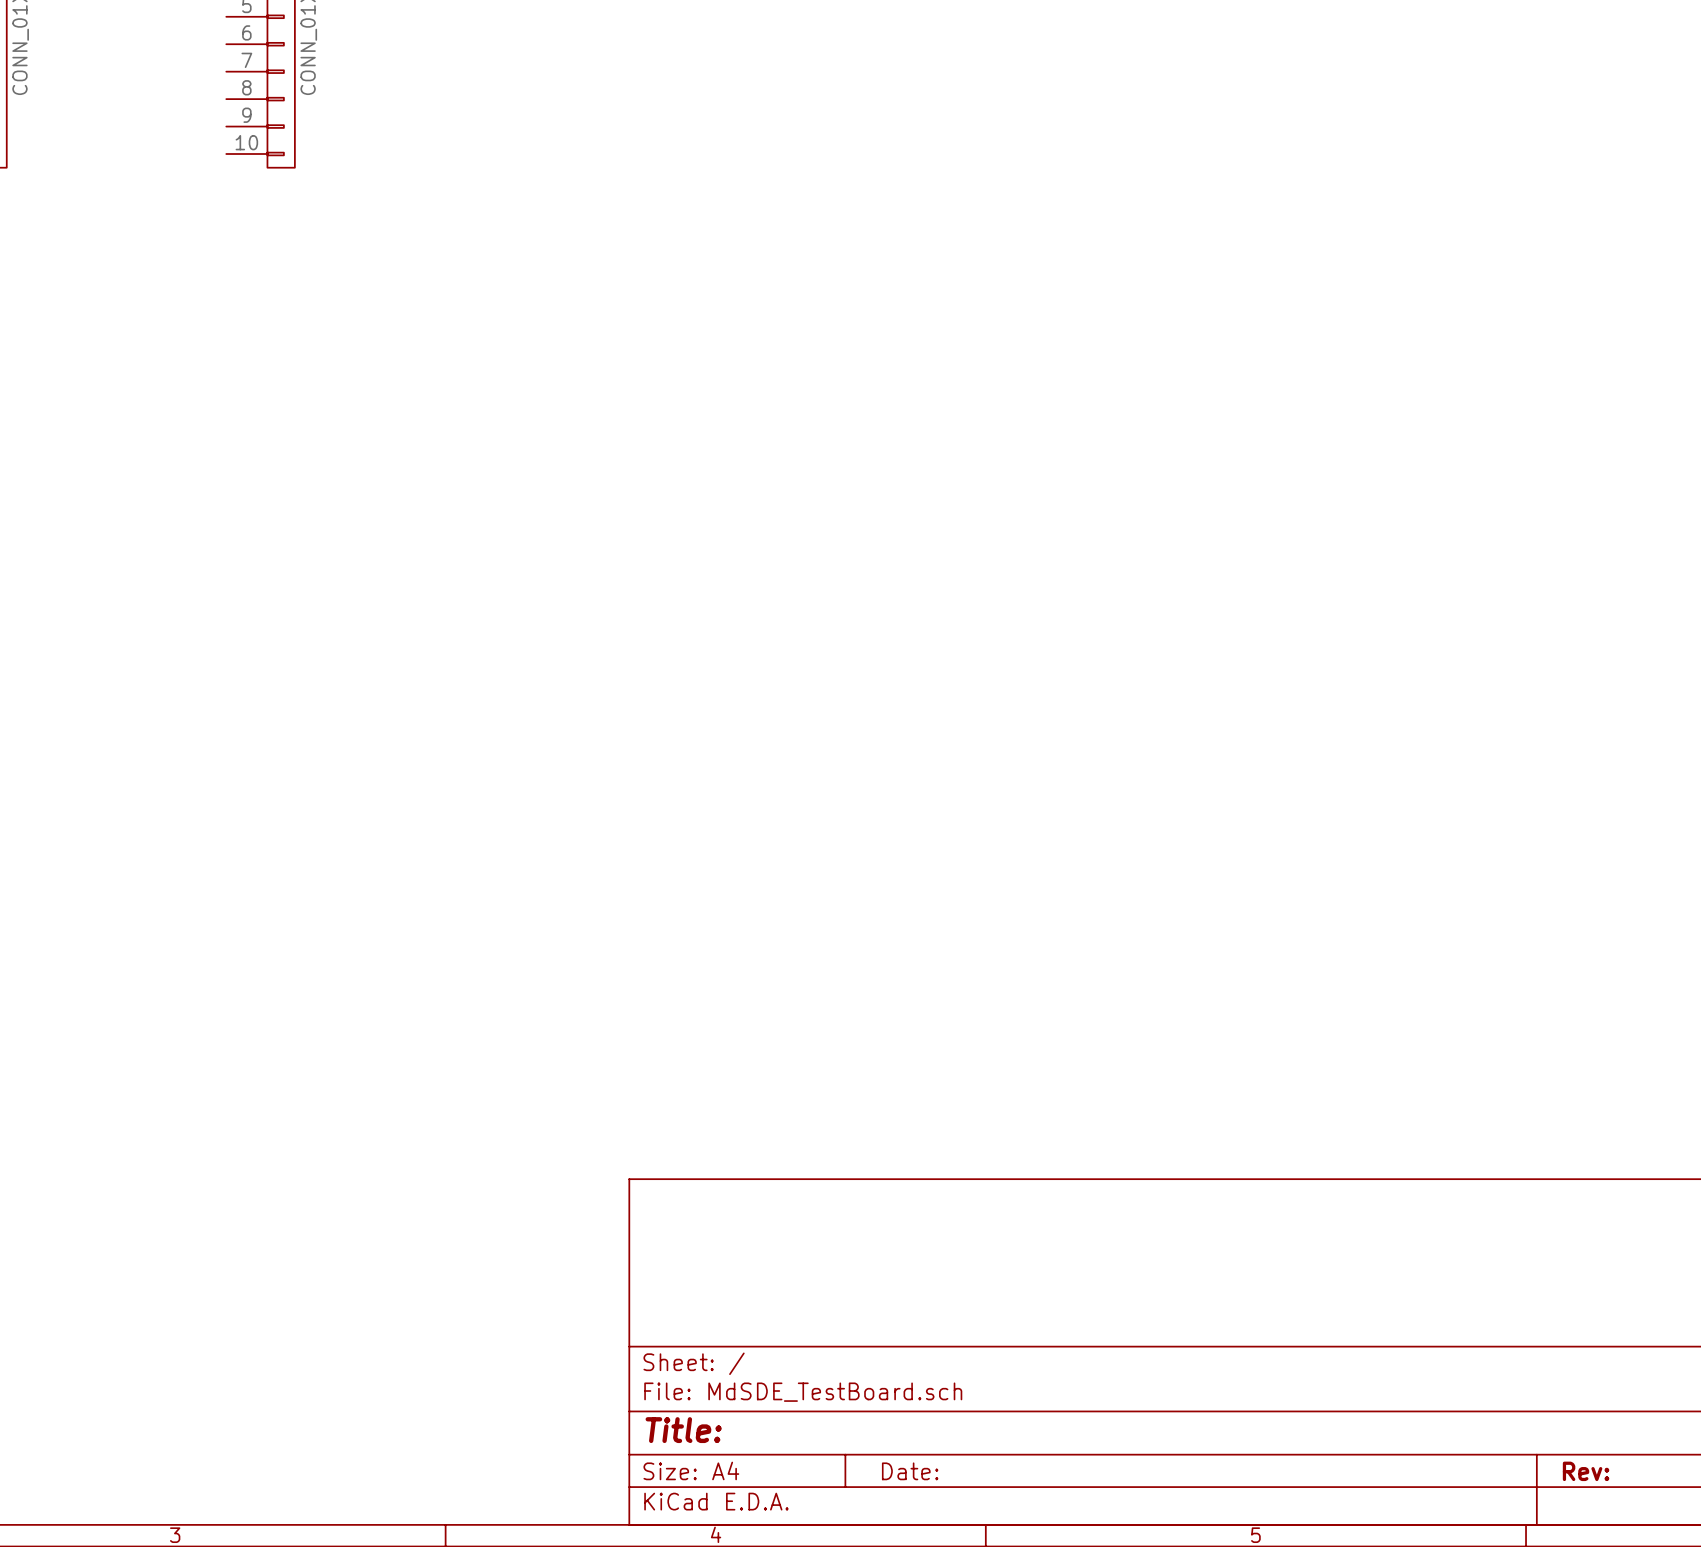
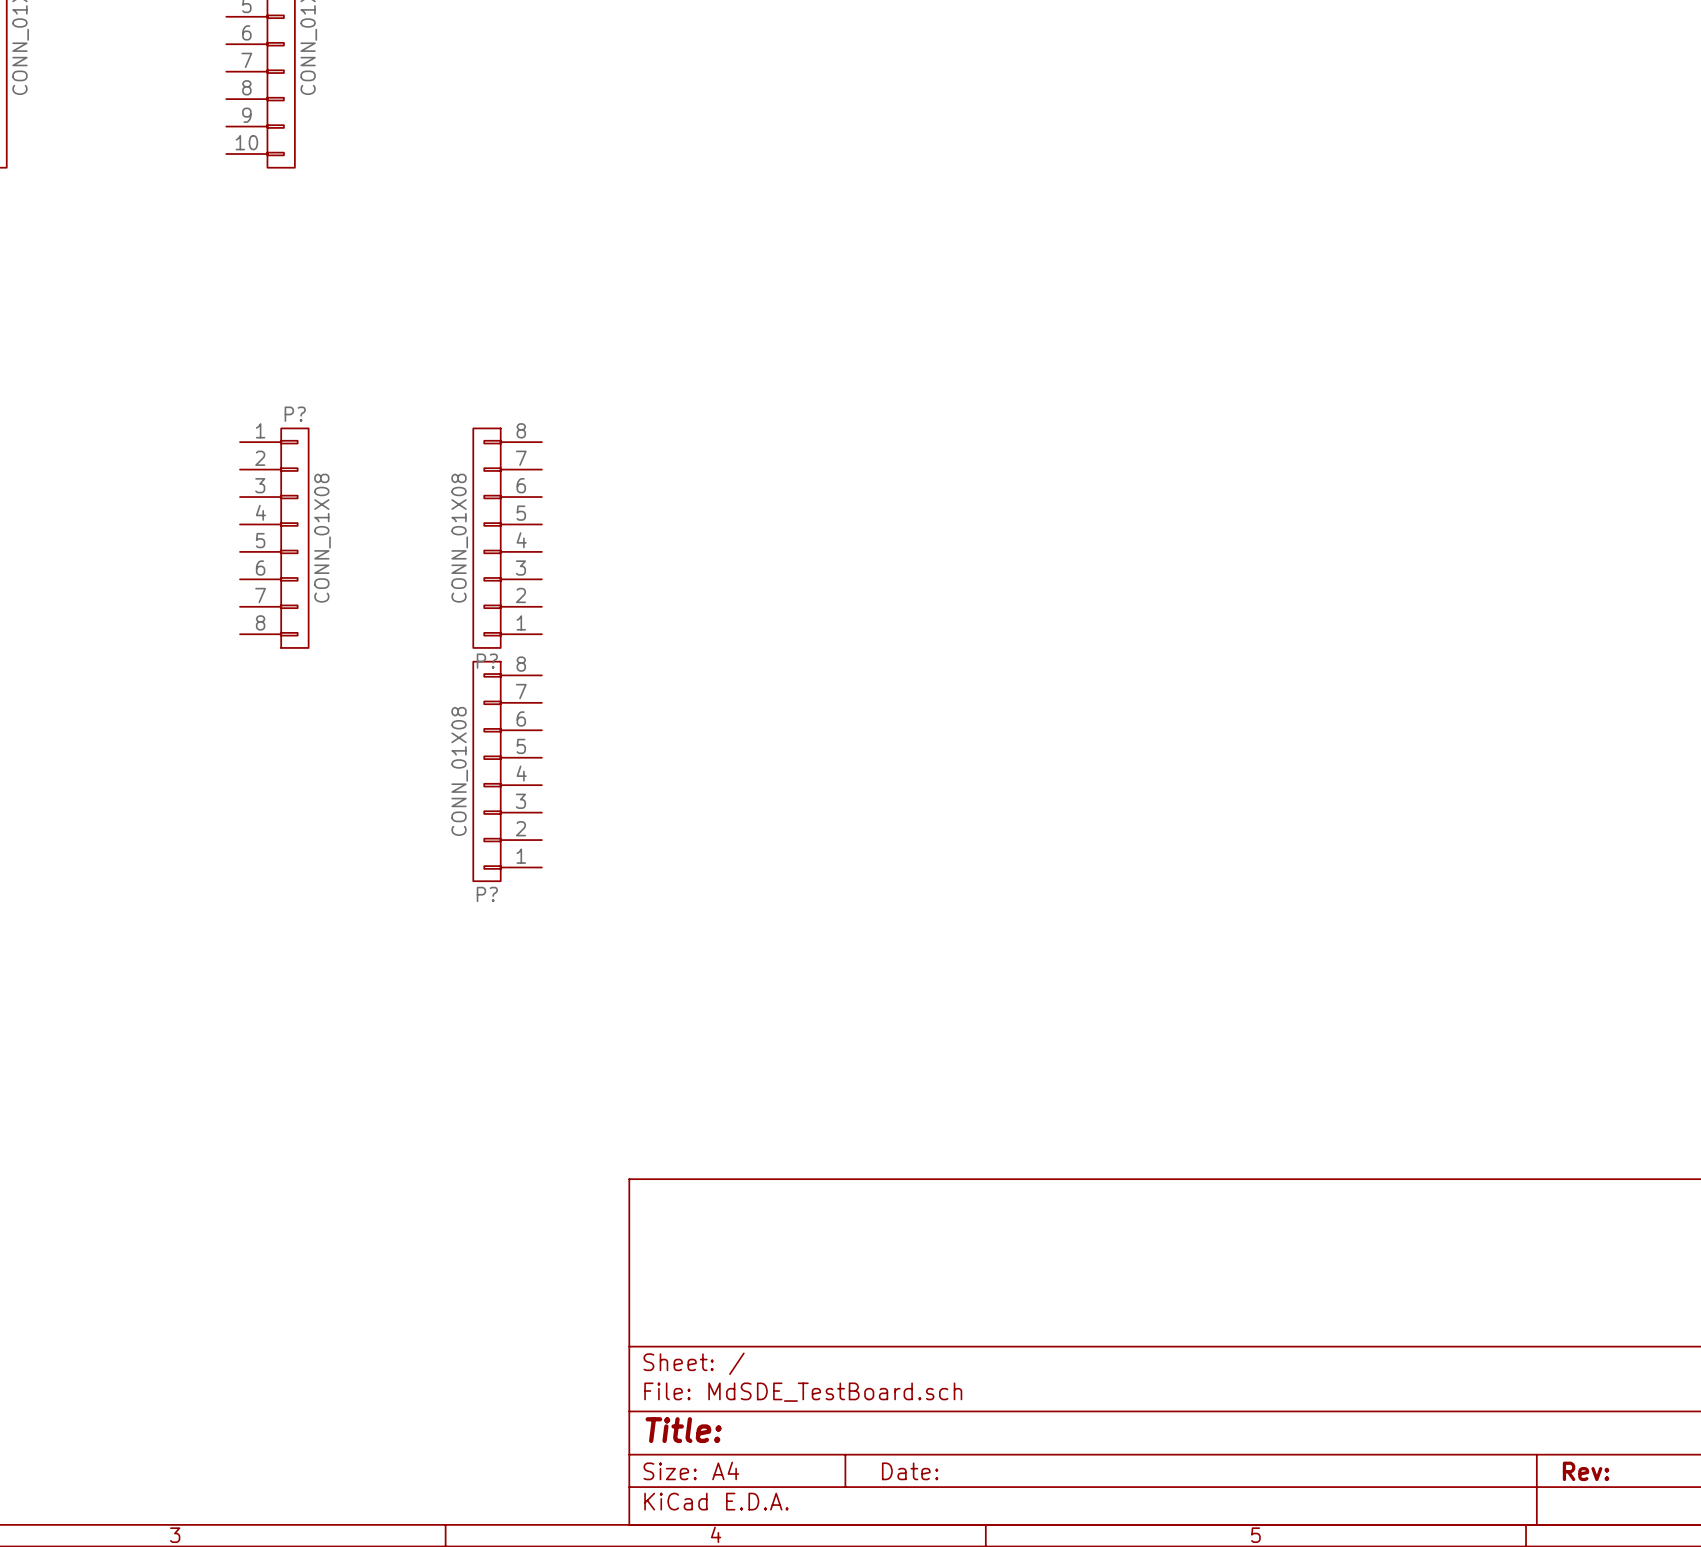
P?: none -> CONN_01X08 (274, 538)
P?: none -> CONN_01X08 (507, 538)
P?: none -> CONN_01X08 (507, 771)

